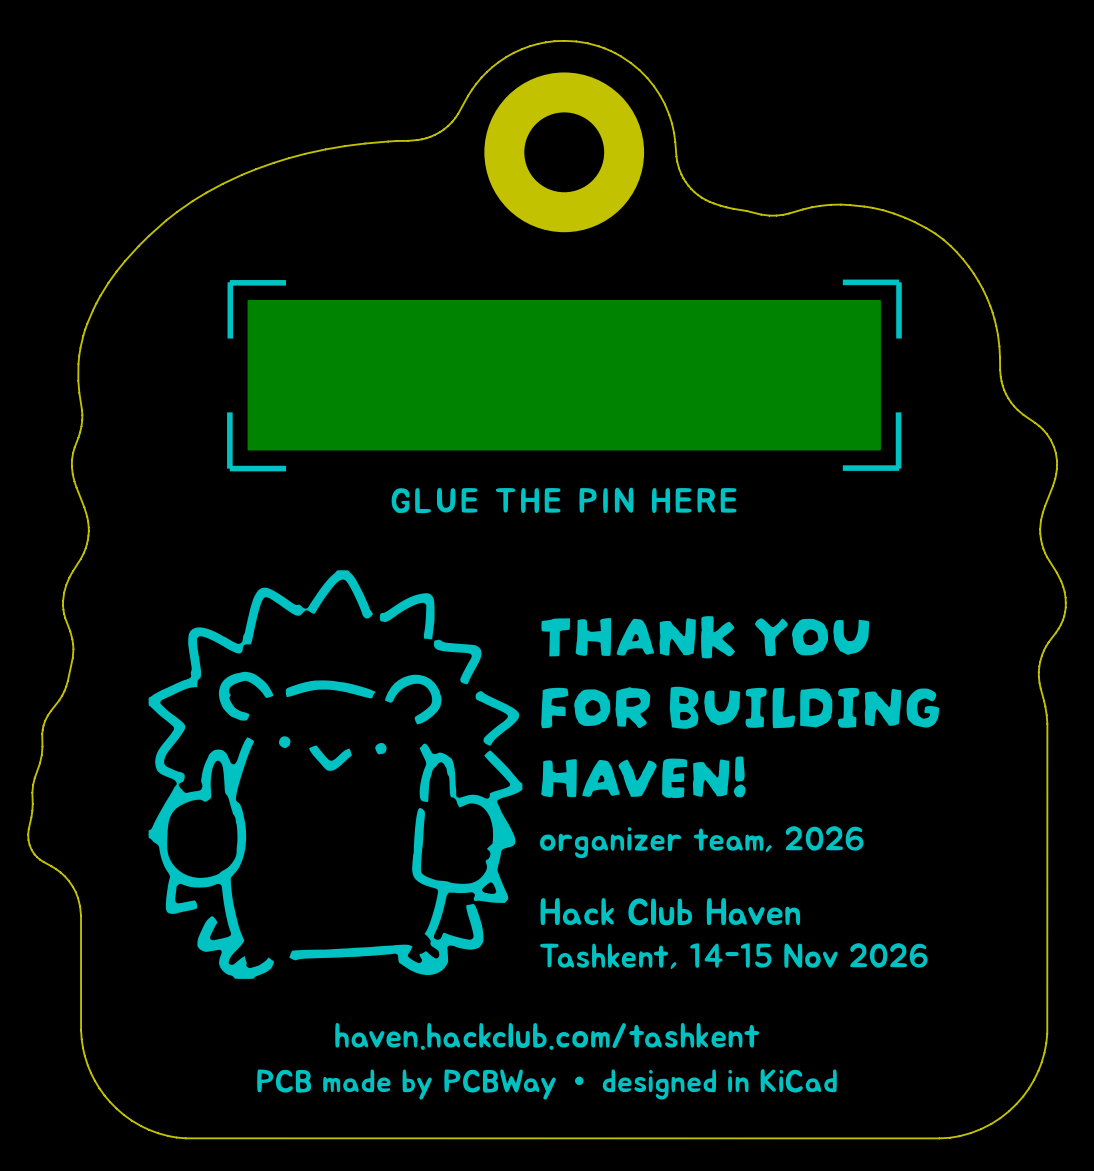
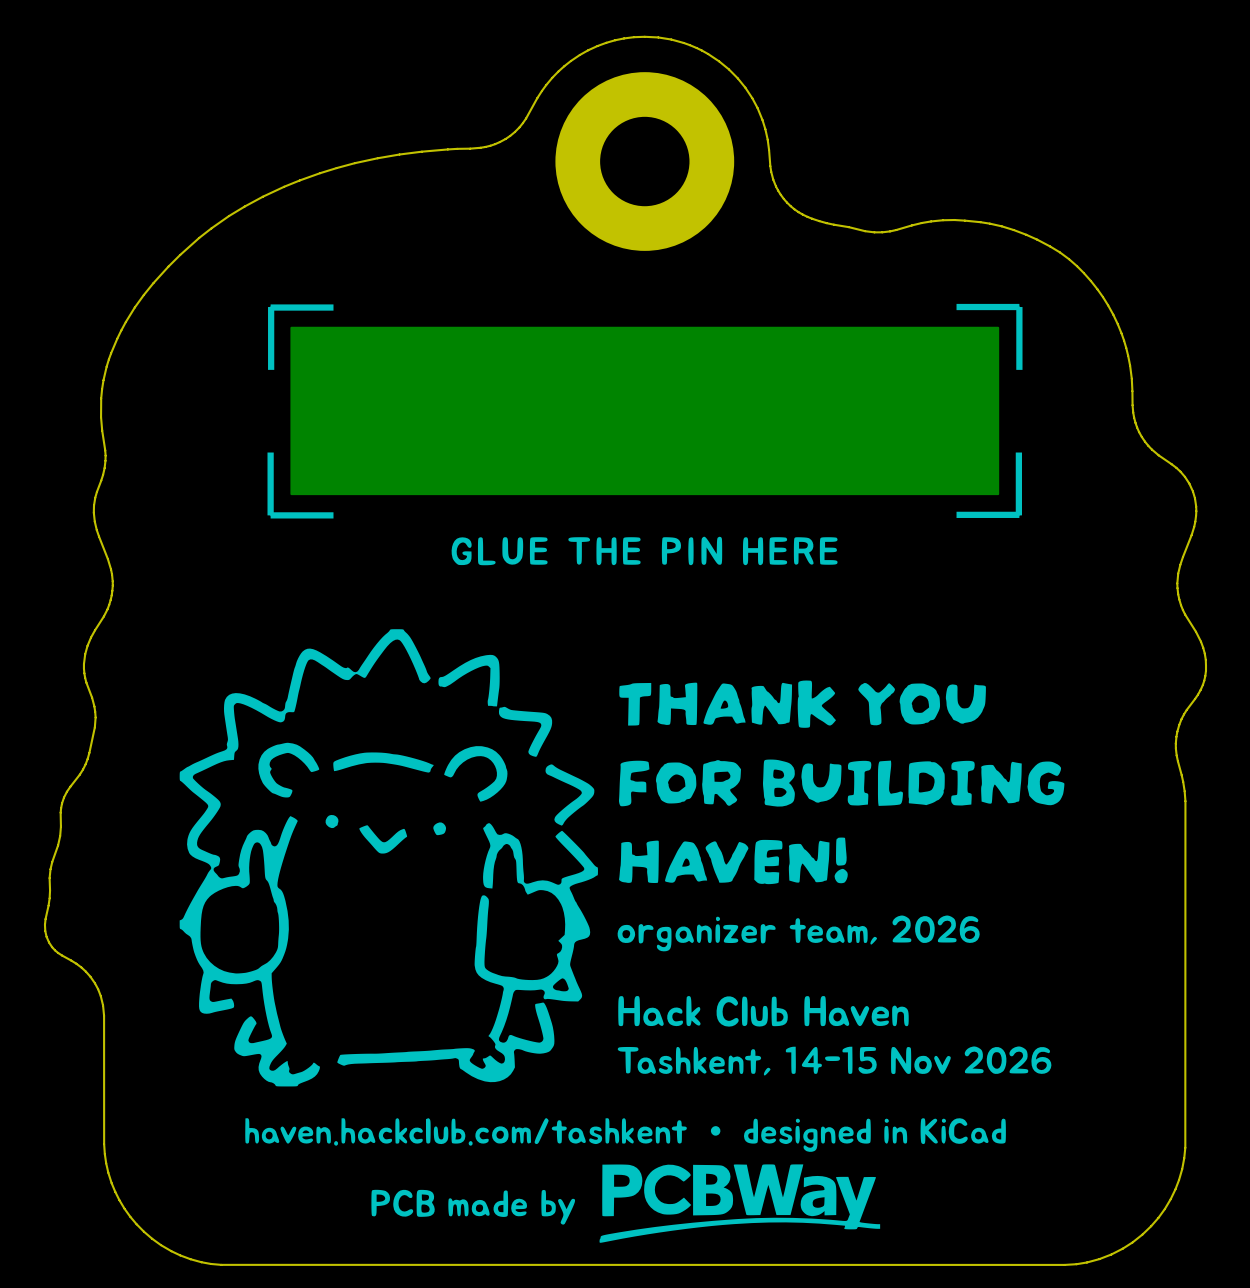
drawing shape: [148, 279, 940, 1100] -> [179, 303, 1065, 1243]

